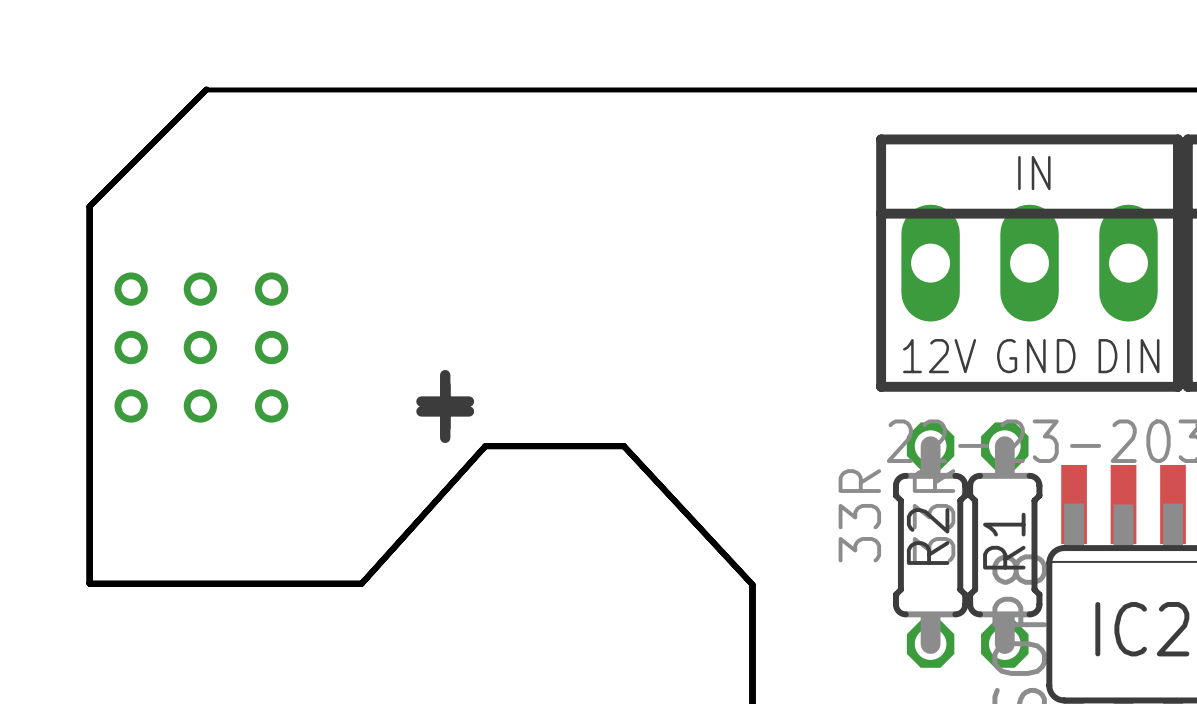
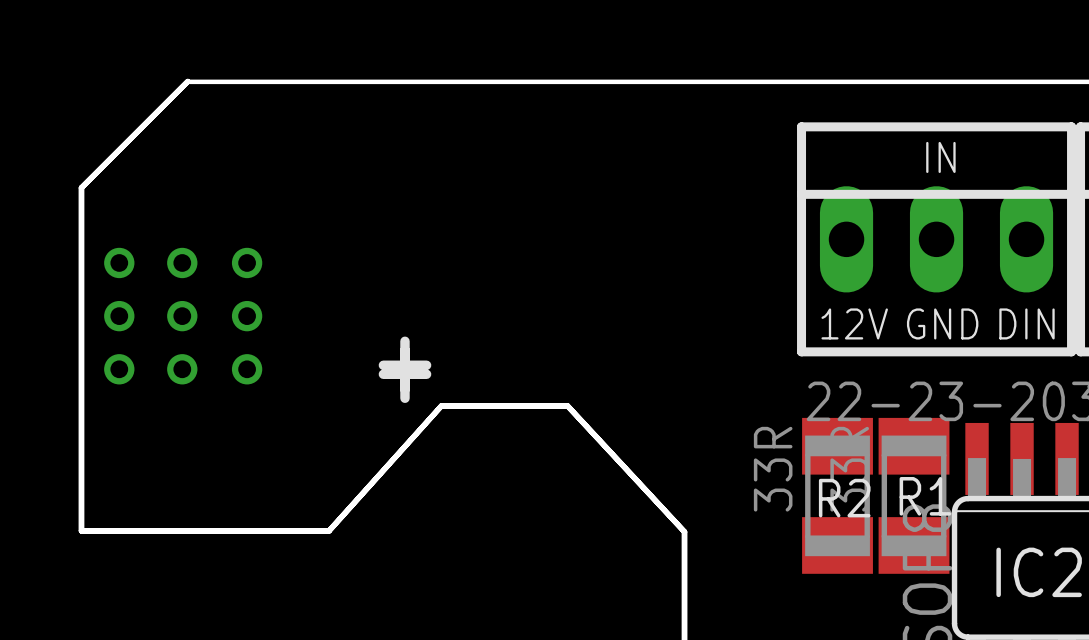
R2 footprint: [893, 422, 969, 668] -> [802, 417, 873, 574]
R1 footprint: [967, 422, 1043, 668] -> [878, 417, 950, 574]

